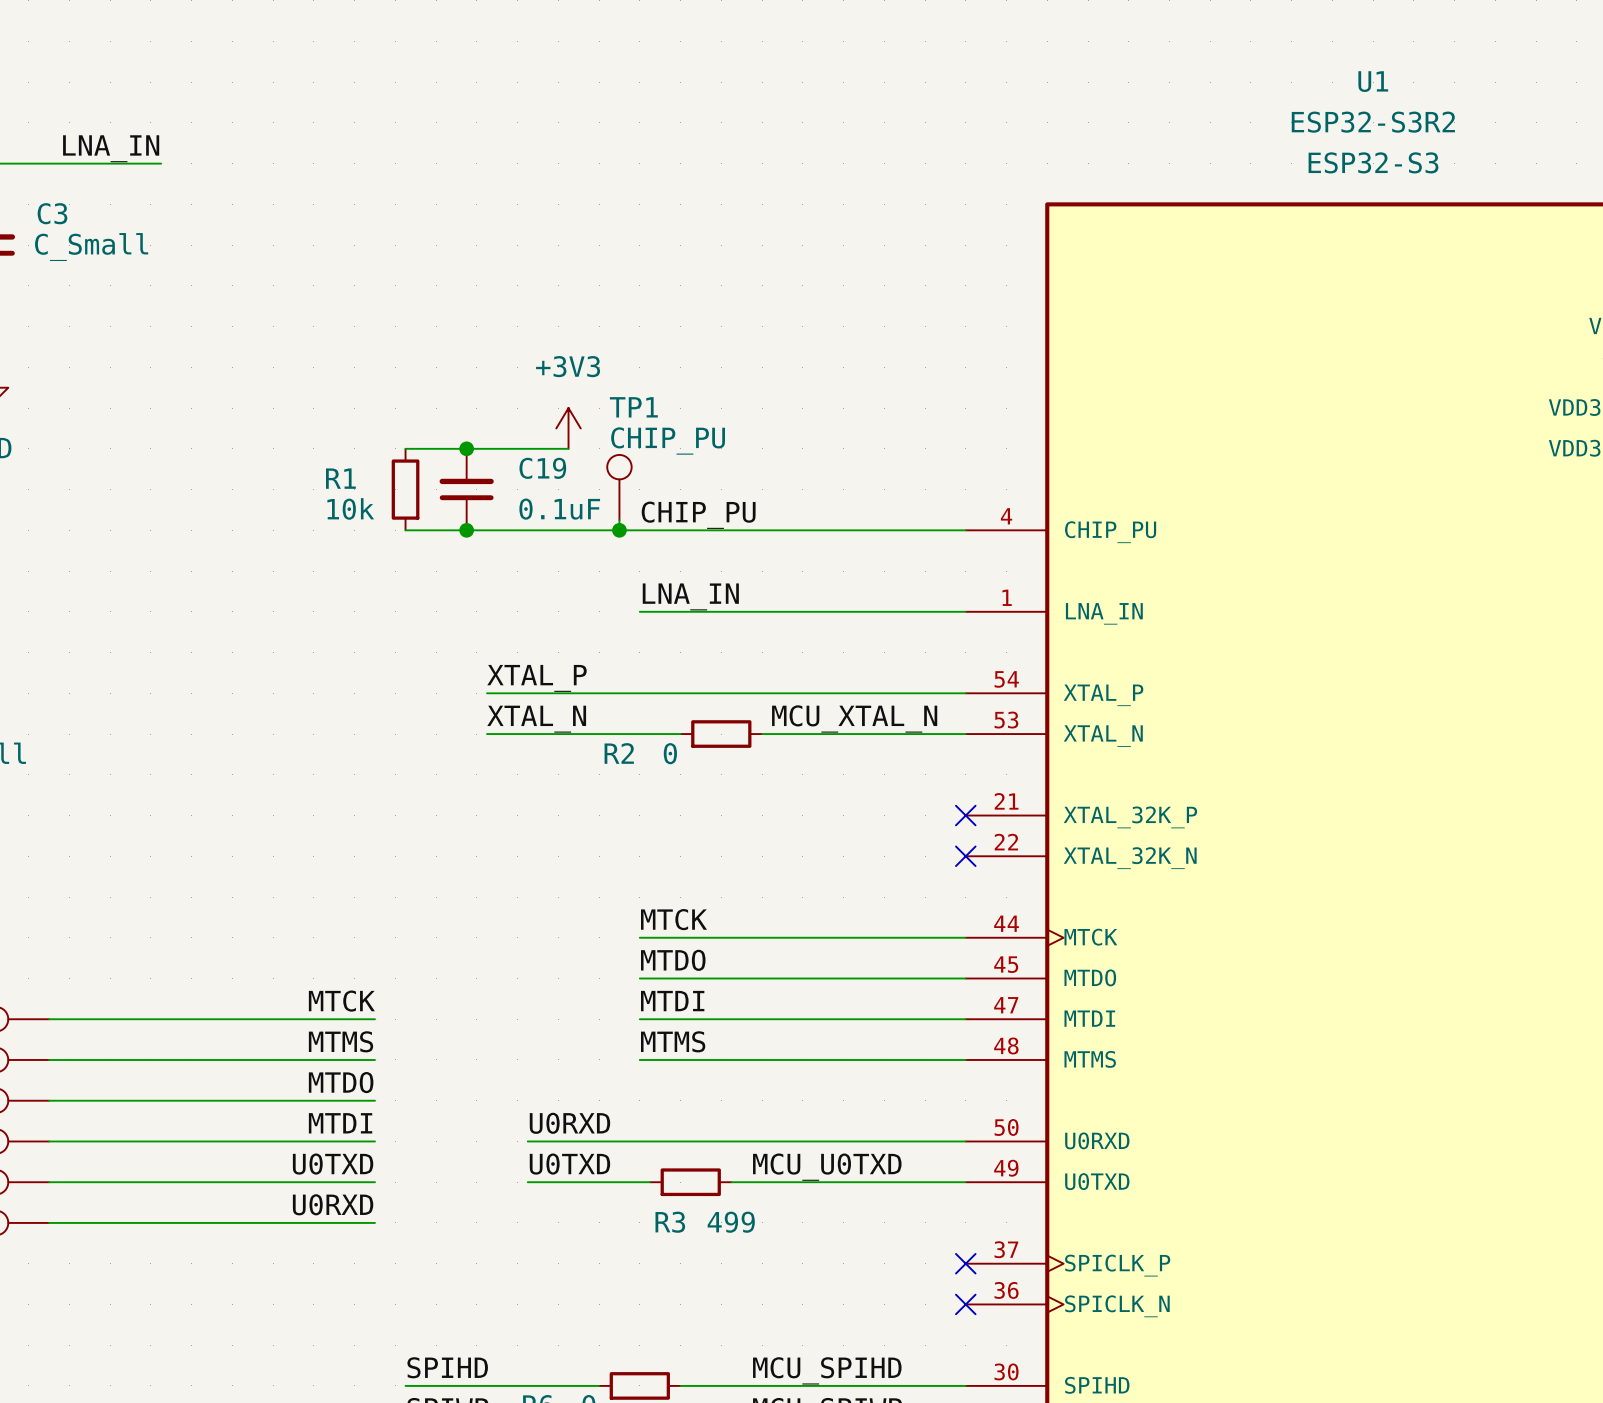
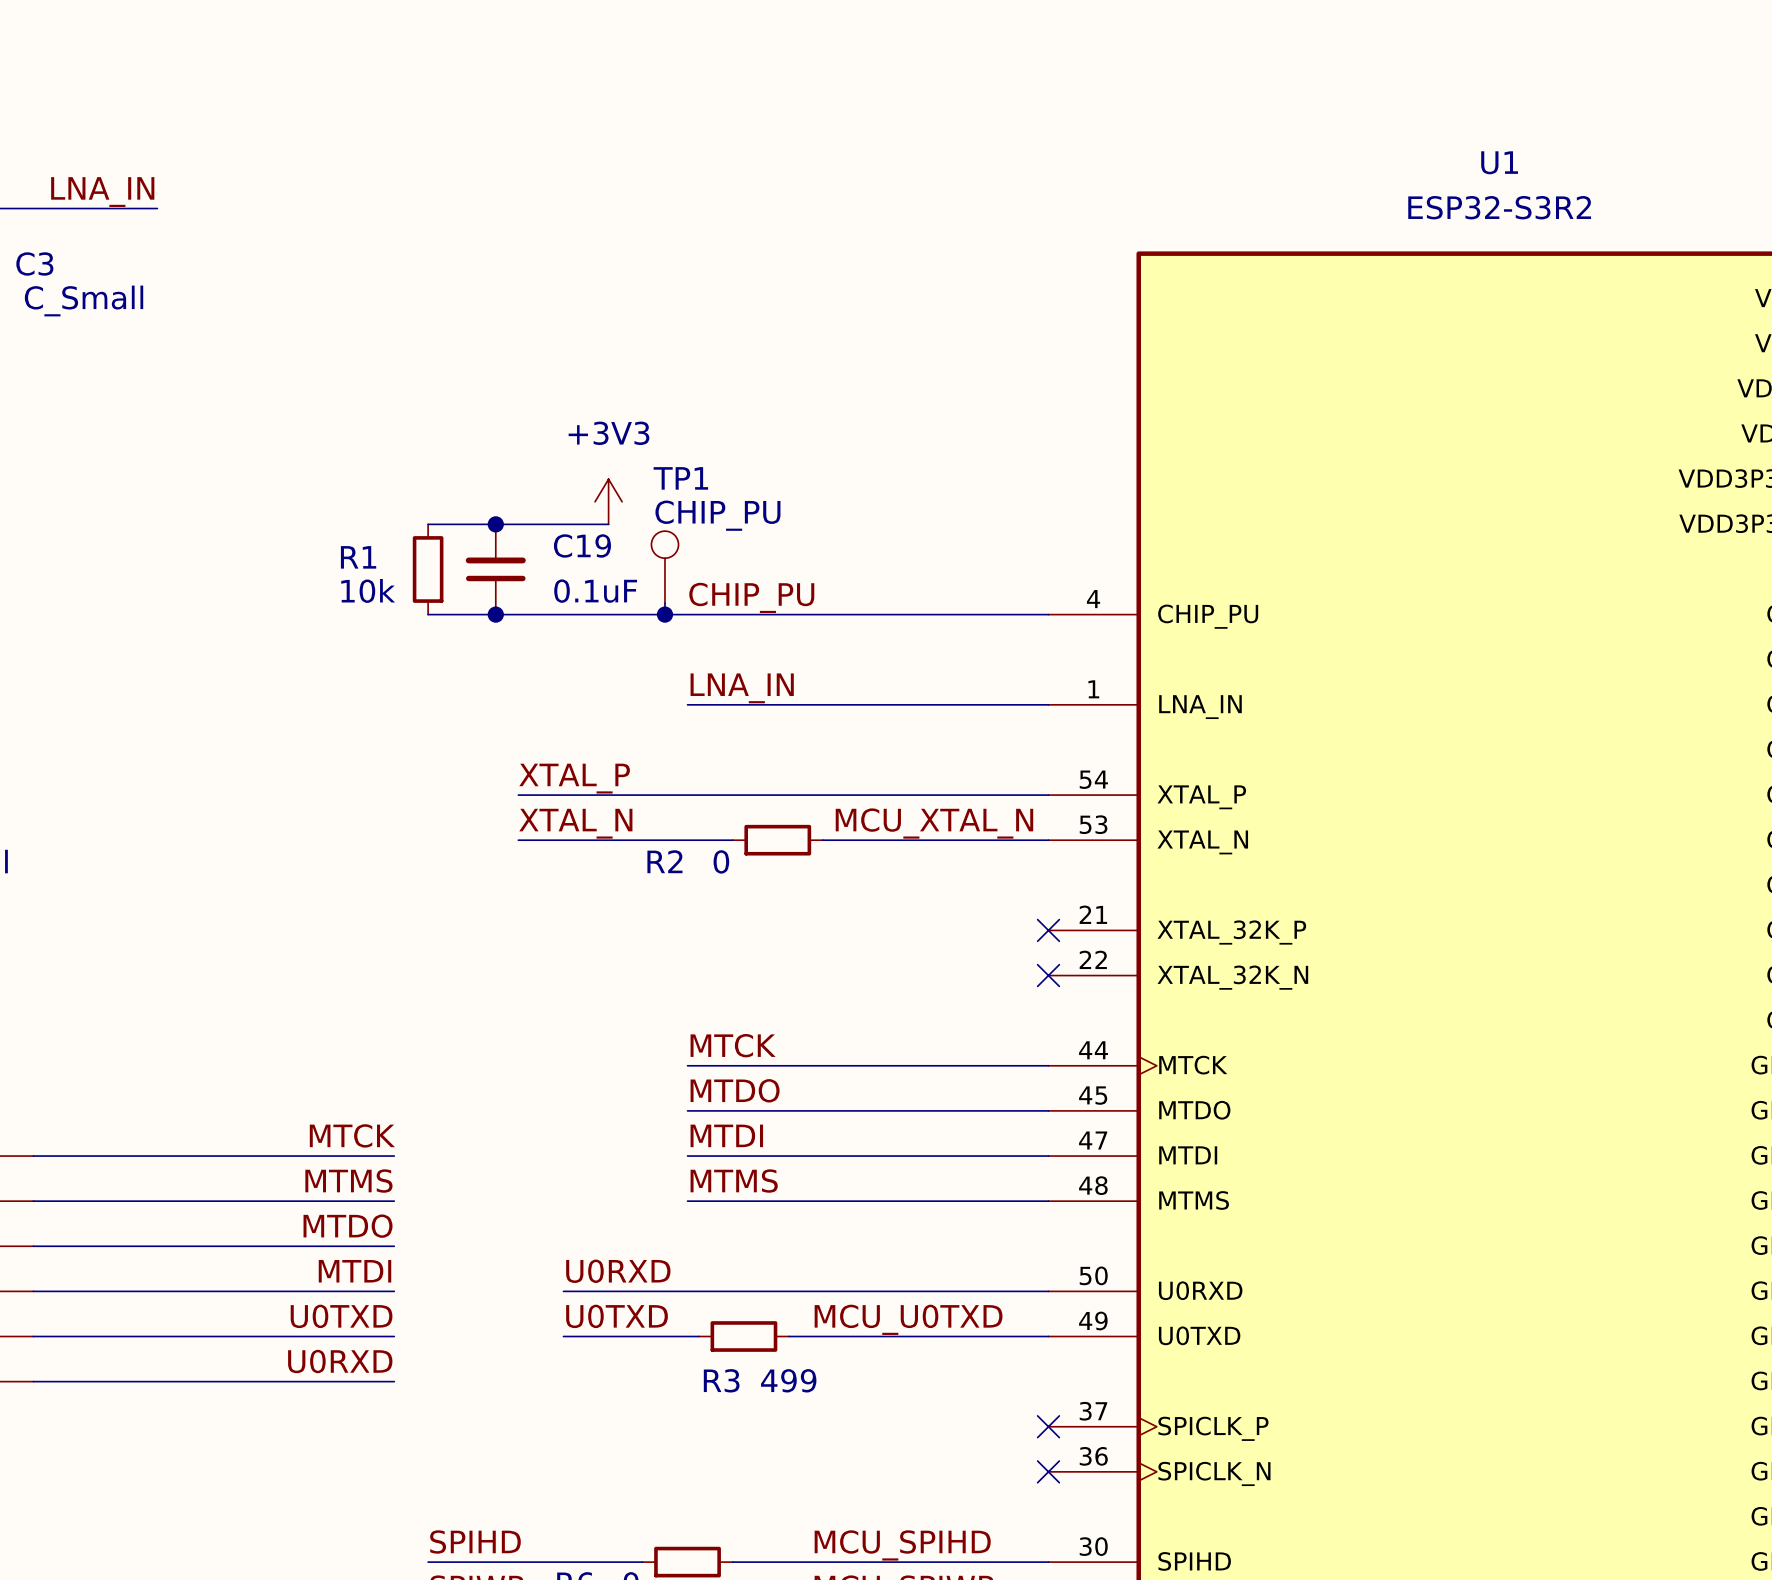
U1 name position: U1 (1373, 81) -> U1 (1499, 162)
U1 value position: ESP32-S3R2 (1373, 122) -> ESP32-S3R2 (1499, 207)
U1 text: ESP32-S3 (1373, 162) -> none

